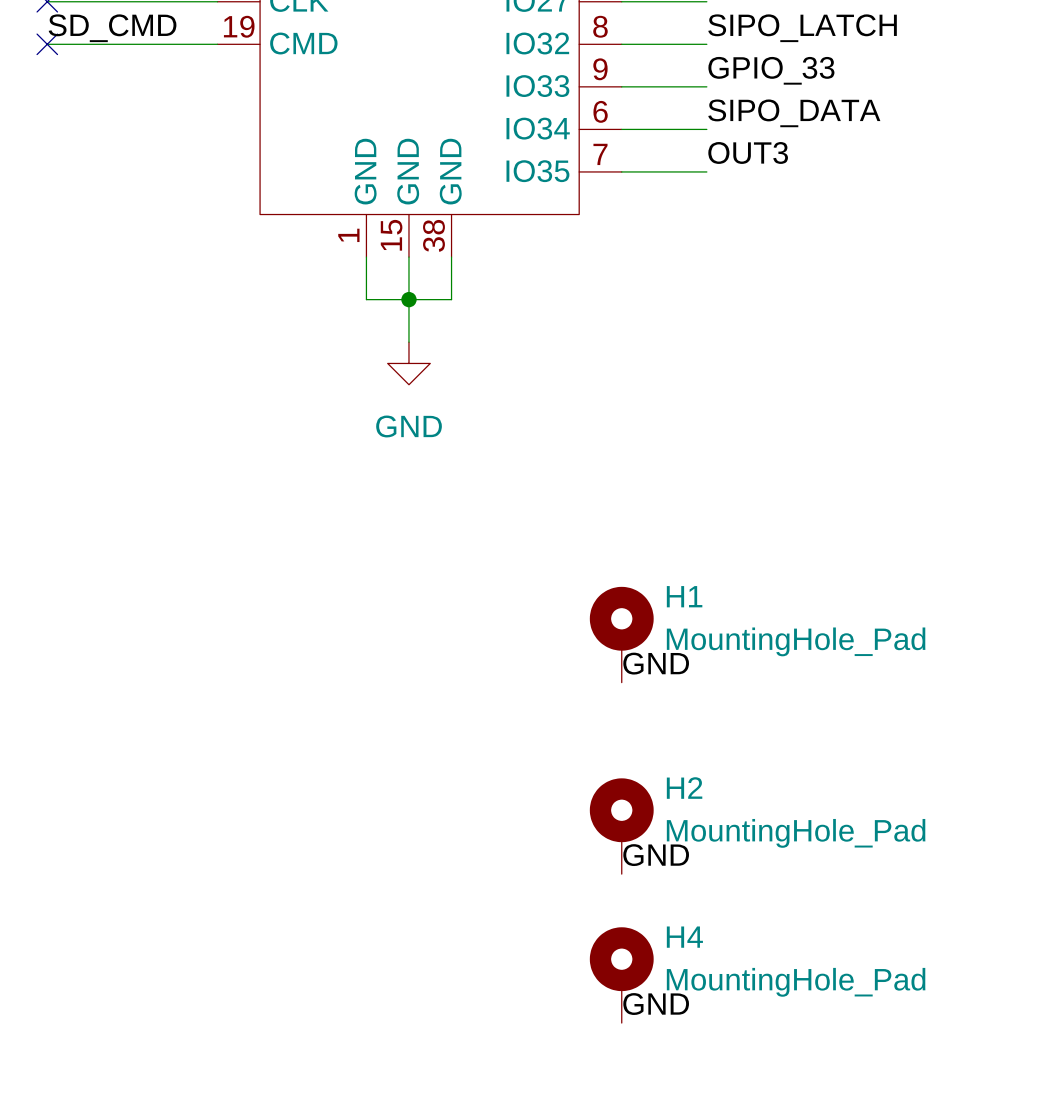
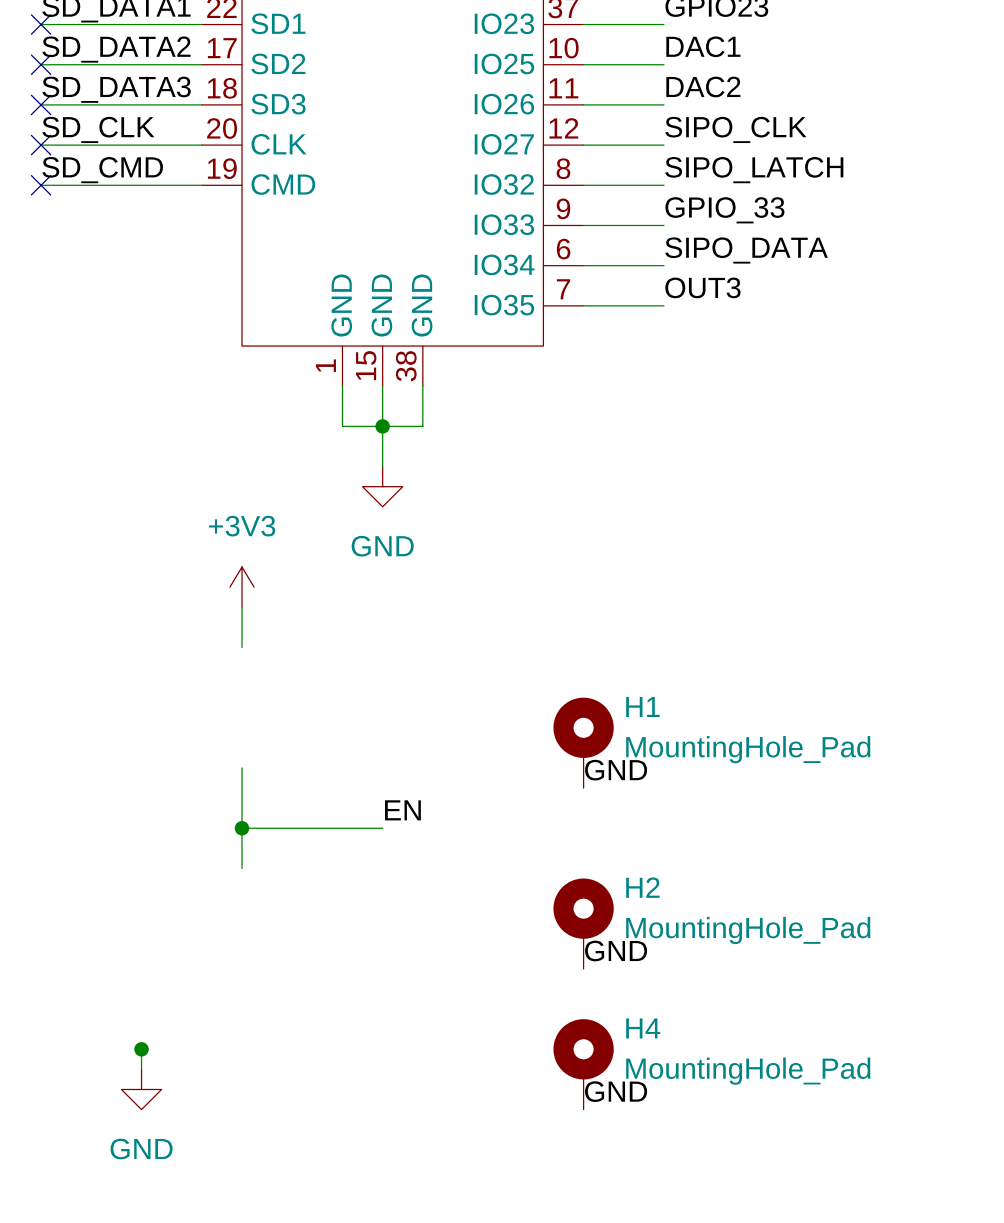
power symbol: none -> +3V3 (242, 587)
wire: none -> (242, 607) (242, 647)
wire: none -> (242, 767) (242, 868)
label: none -> EN (402, 810)
wire: none -> (242, 828) (382, 828)
junction: none -> (242, 828)
wire: none -> (141, 1049) (141, 1069)
junction: none -> (141, 1049)
power symbol: none -> GND (141, 1089)

